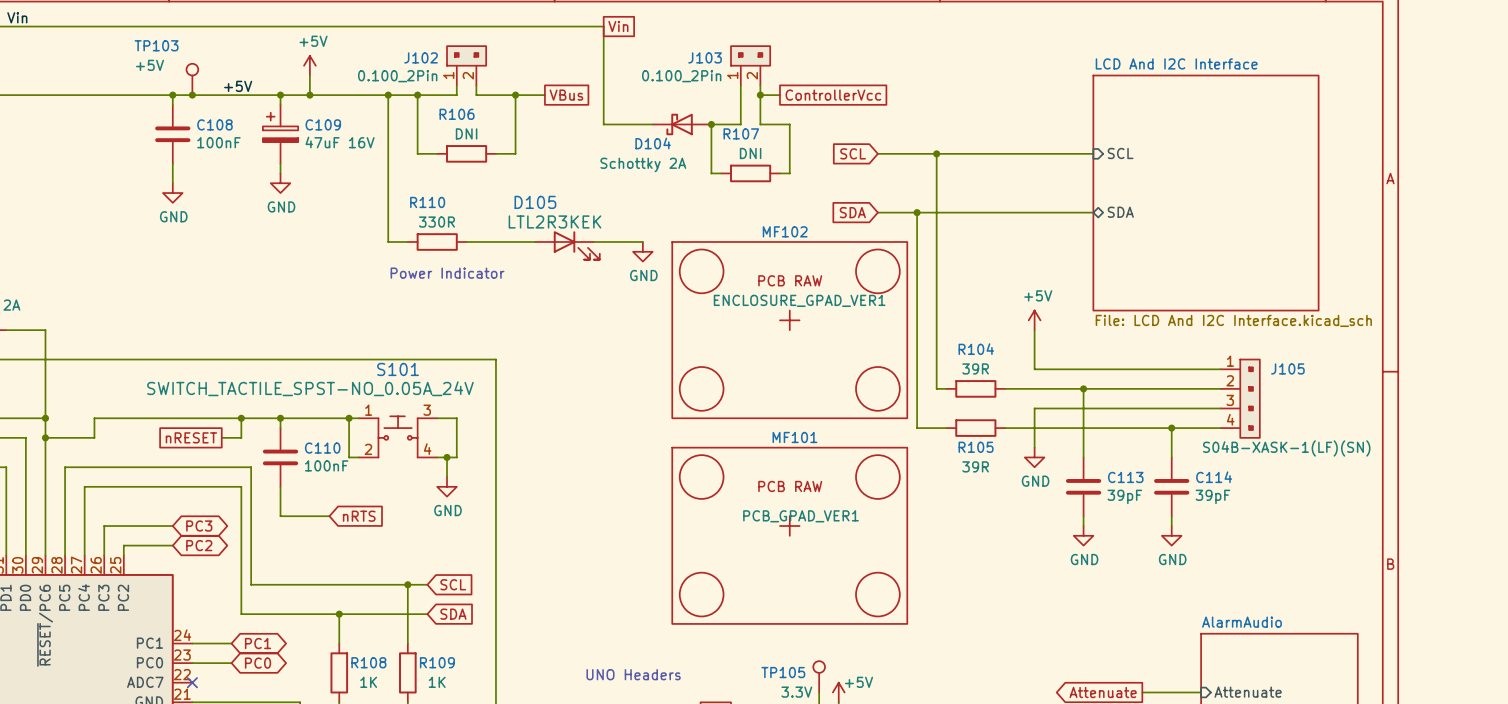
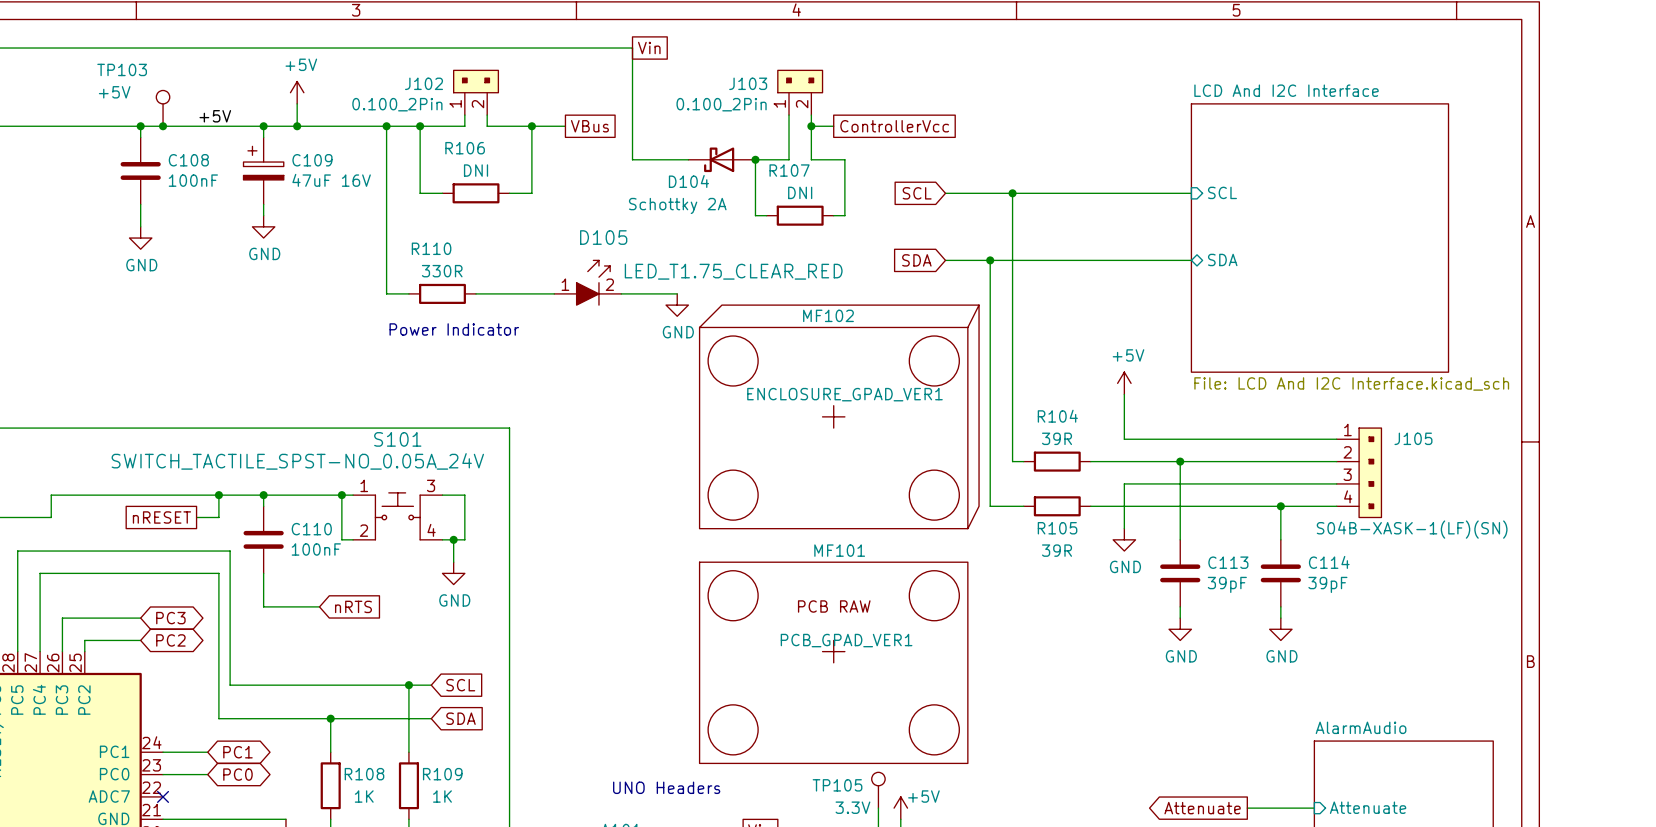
D105 name position: D105 (535, 202) -> D105 (603, 237)
D105 value: LTL2R3KEK (555, 221) -> LED_T1.75_CLEAR_RED (733, 271)
D105 symbol: [535, 231, 600, 260] -> [554, 260, 622, 306]
MF102 symbol: [672, 242, 908, 419] -> [699, 305, 980, 529]
MF101 position: (789, 535) -> (833, 662)

